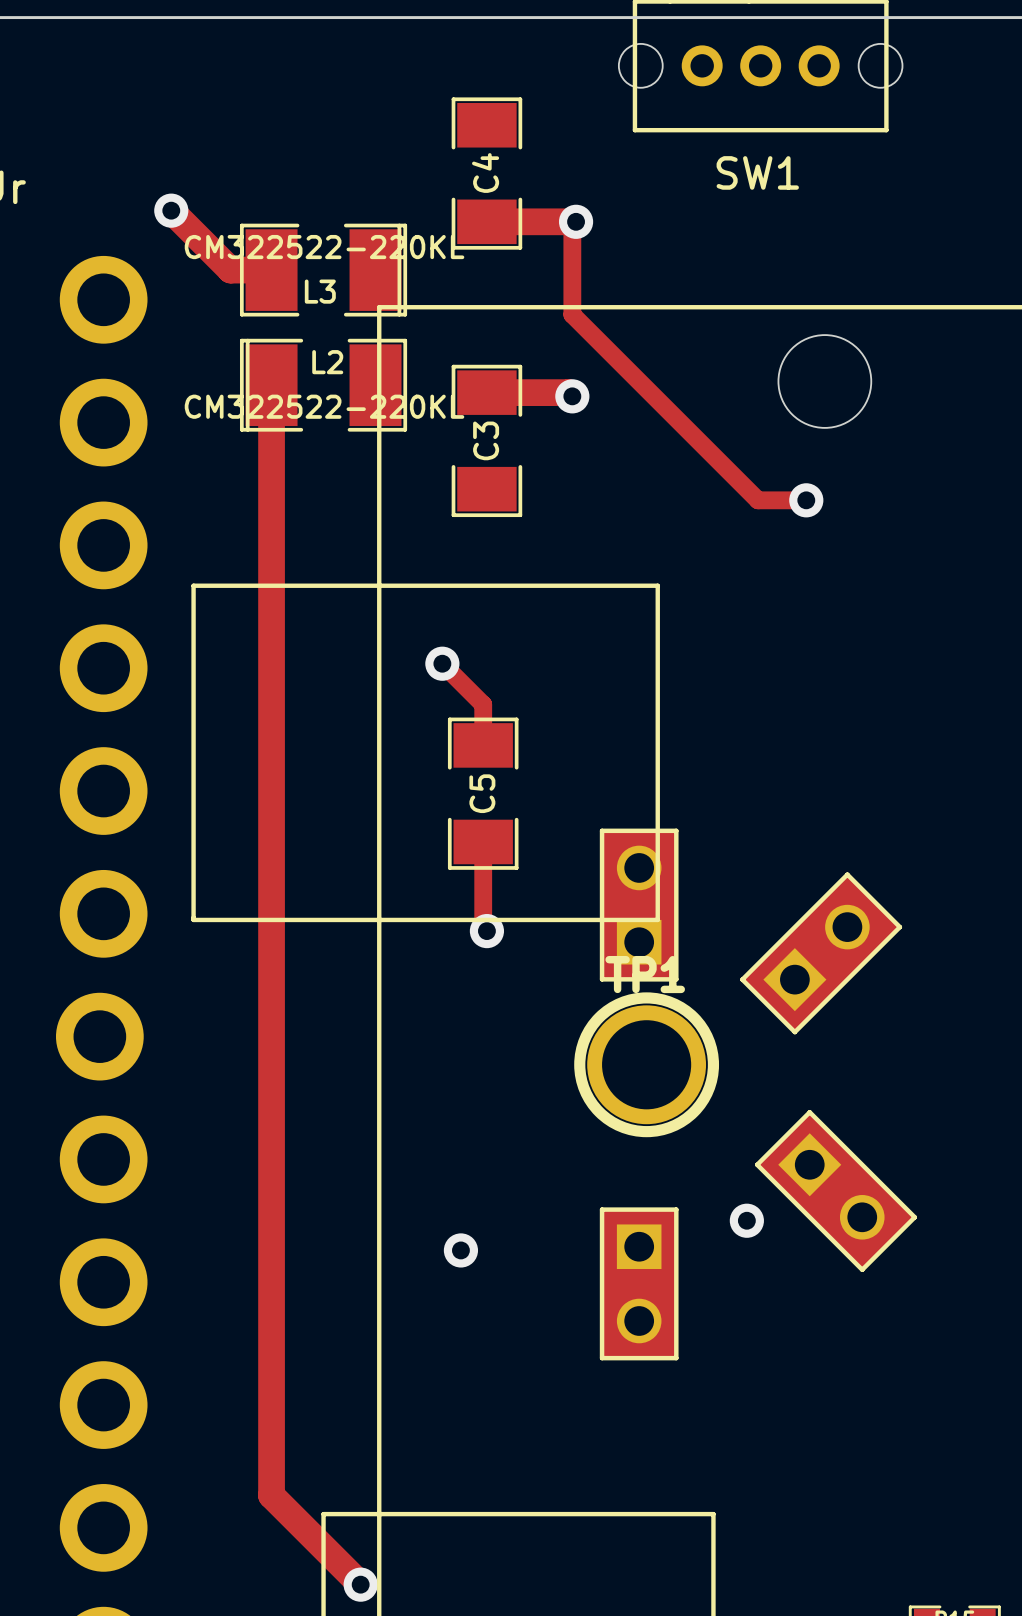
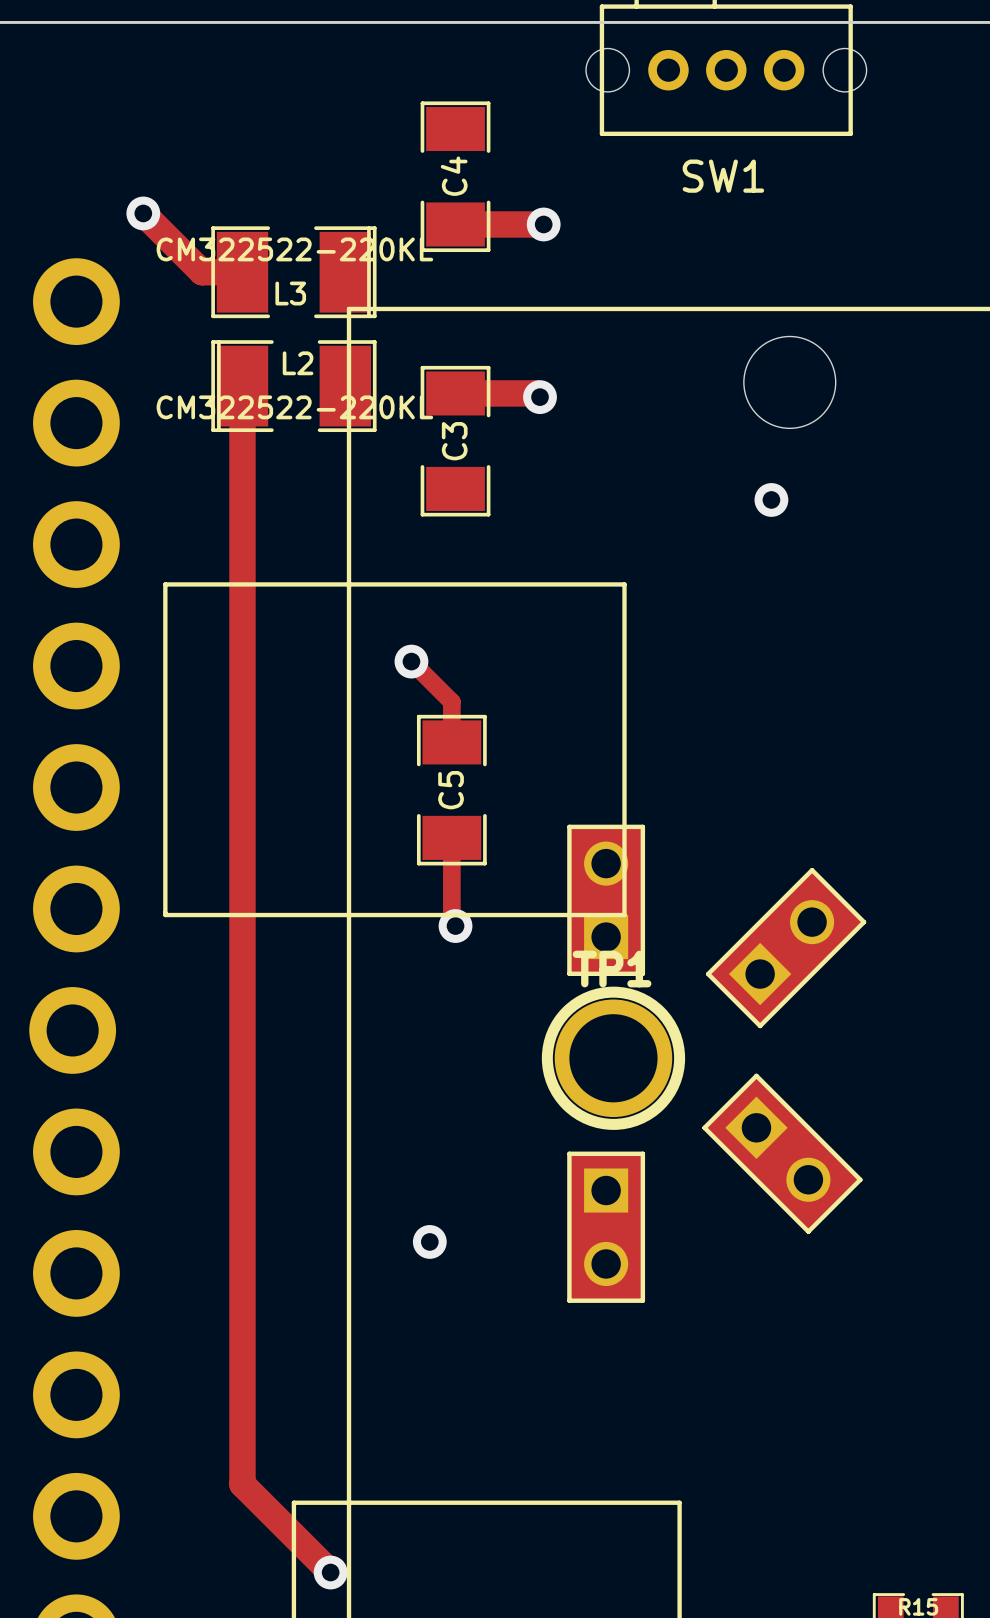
track: (572, 221) (572, 314) (758, 500) (806, 500) -> none
part position: (836, 1191) -> (782, 1153)
via: (746, 1220) -> none
part position: (639, 1283) -> (606, 1227)

